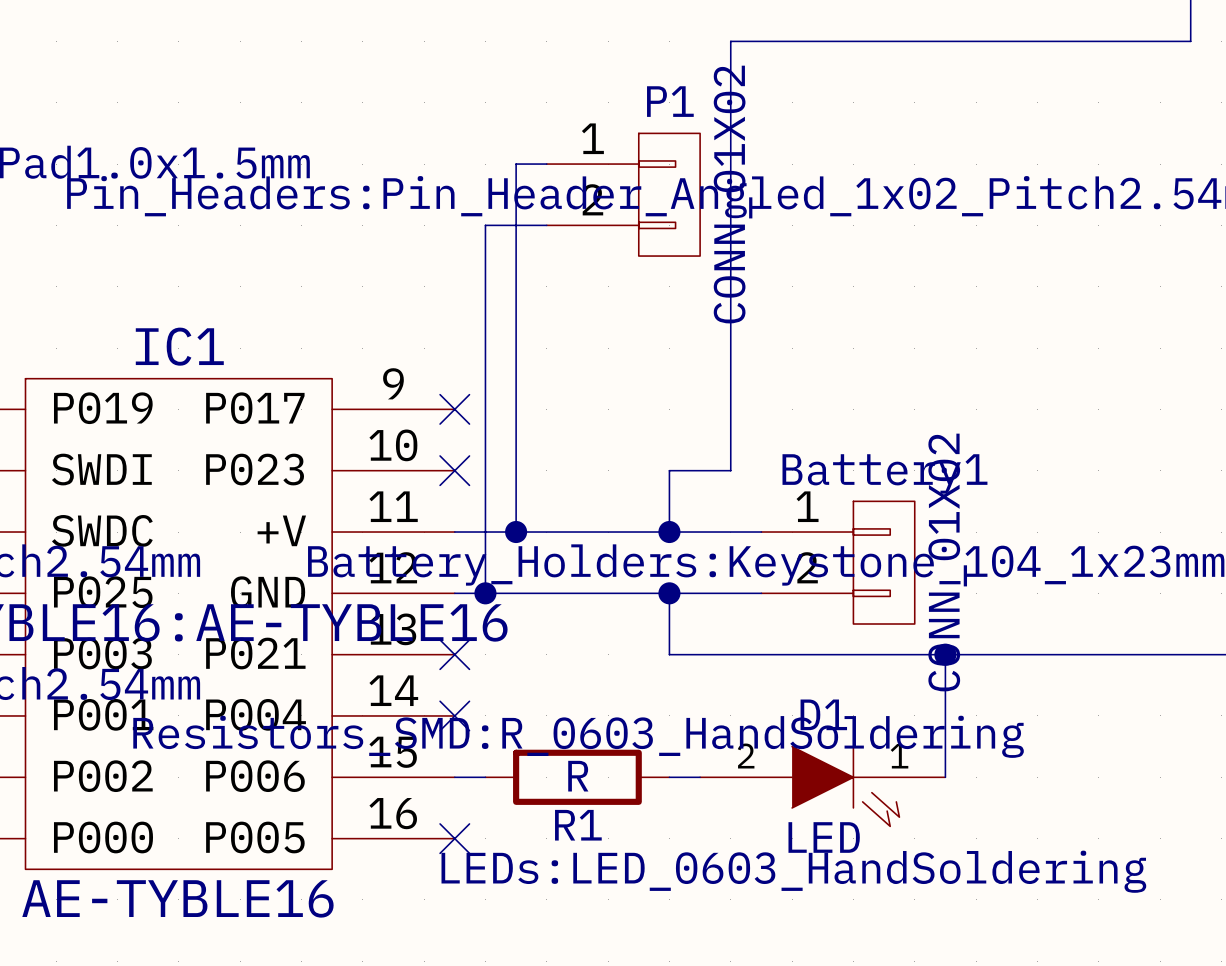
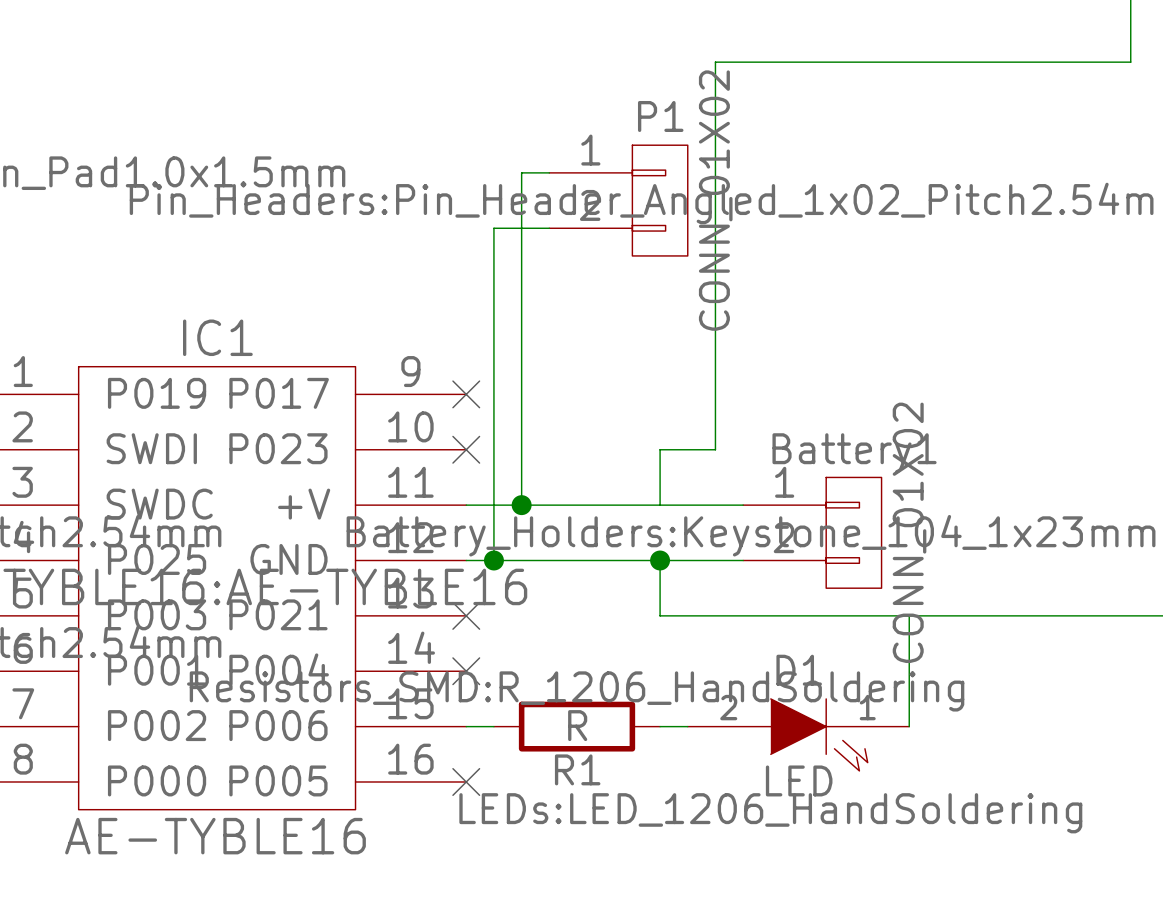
junction: (669, 532) -> none
junction: (945, 654) -> none
R1 text: Resistors_SMD:R_0603_HandSoldering (578, 736) -> Resistors_SMD:R_1206_HandSoldering (577, 691)
D1 text: LEDs:LED_0603_HandSoldering (793, 871) -> LEDs:LED_1206_HandSoldering (770, 813)

